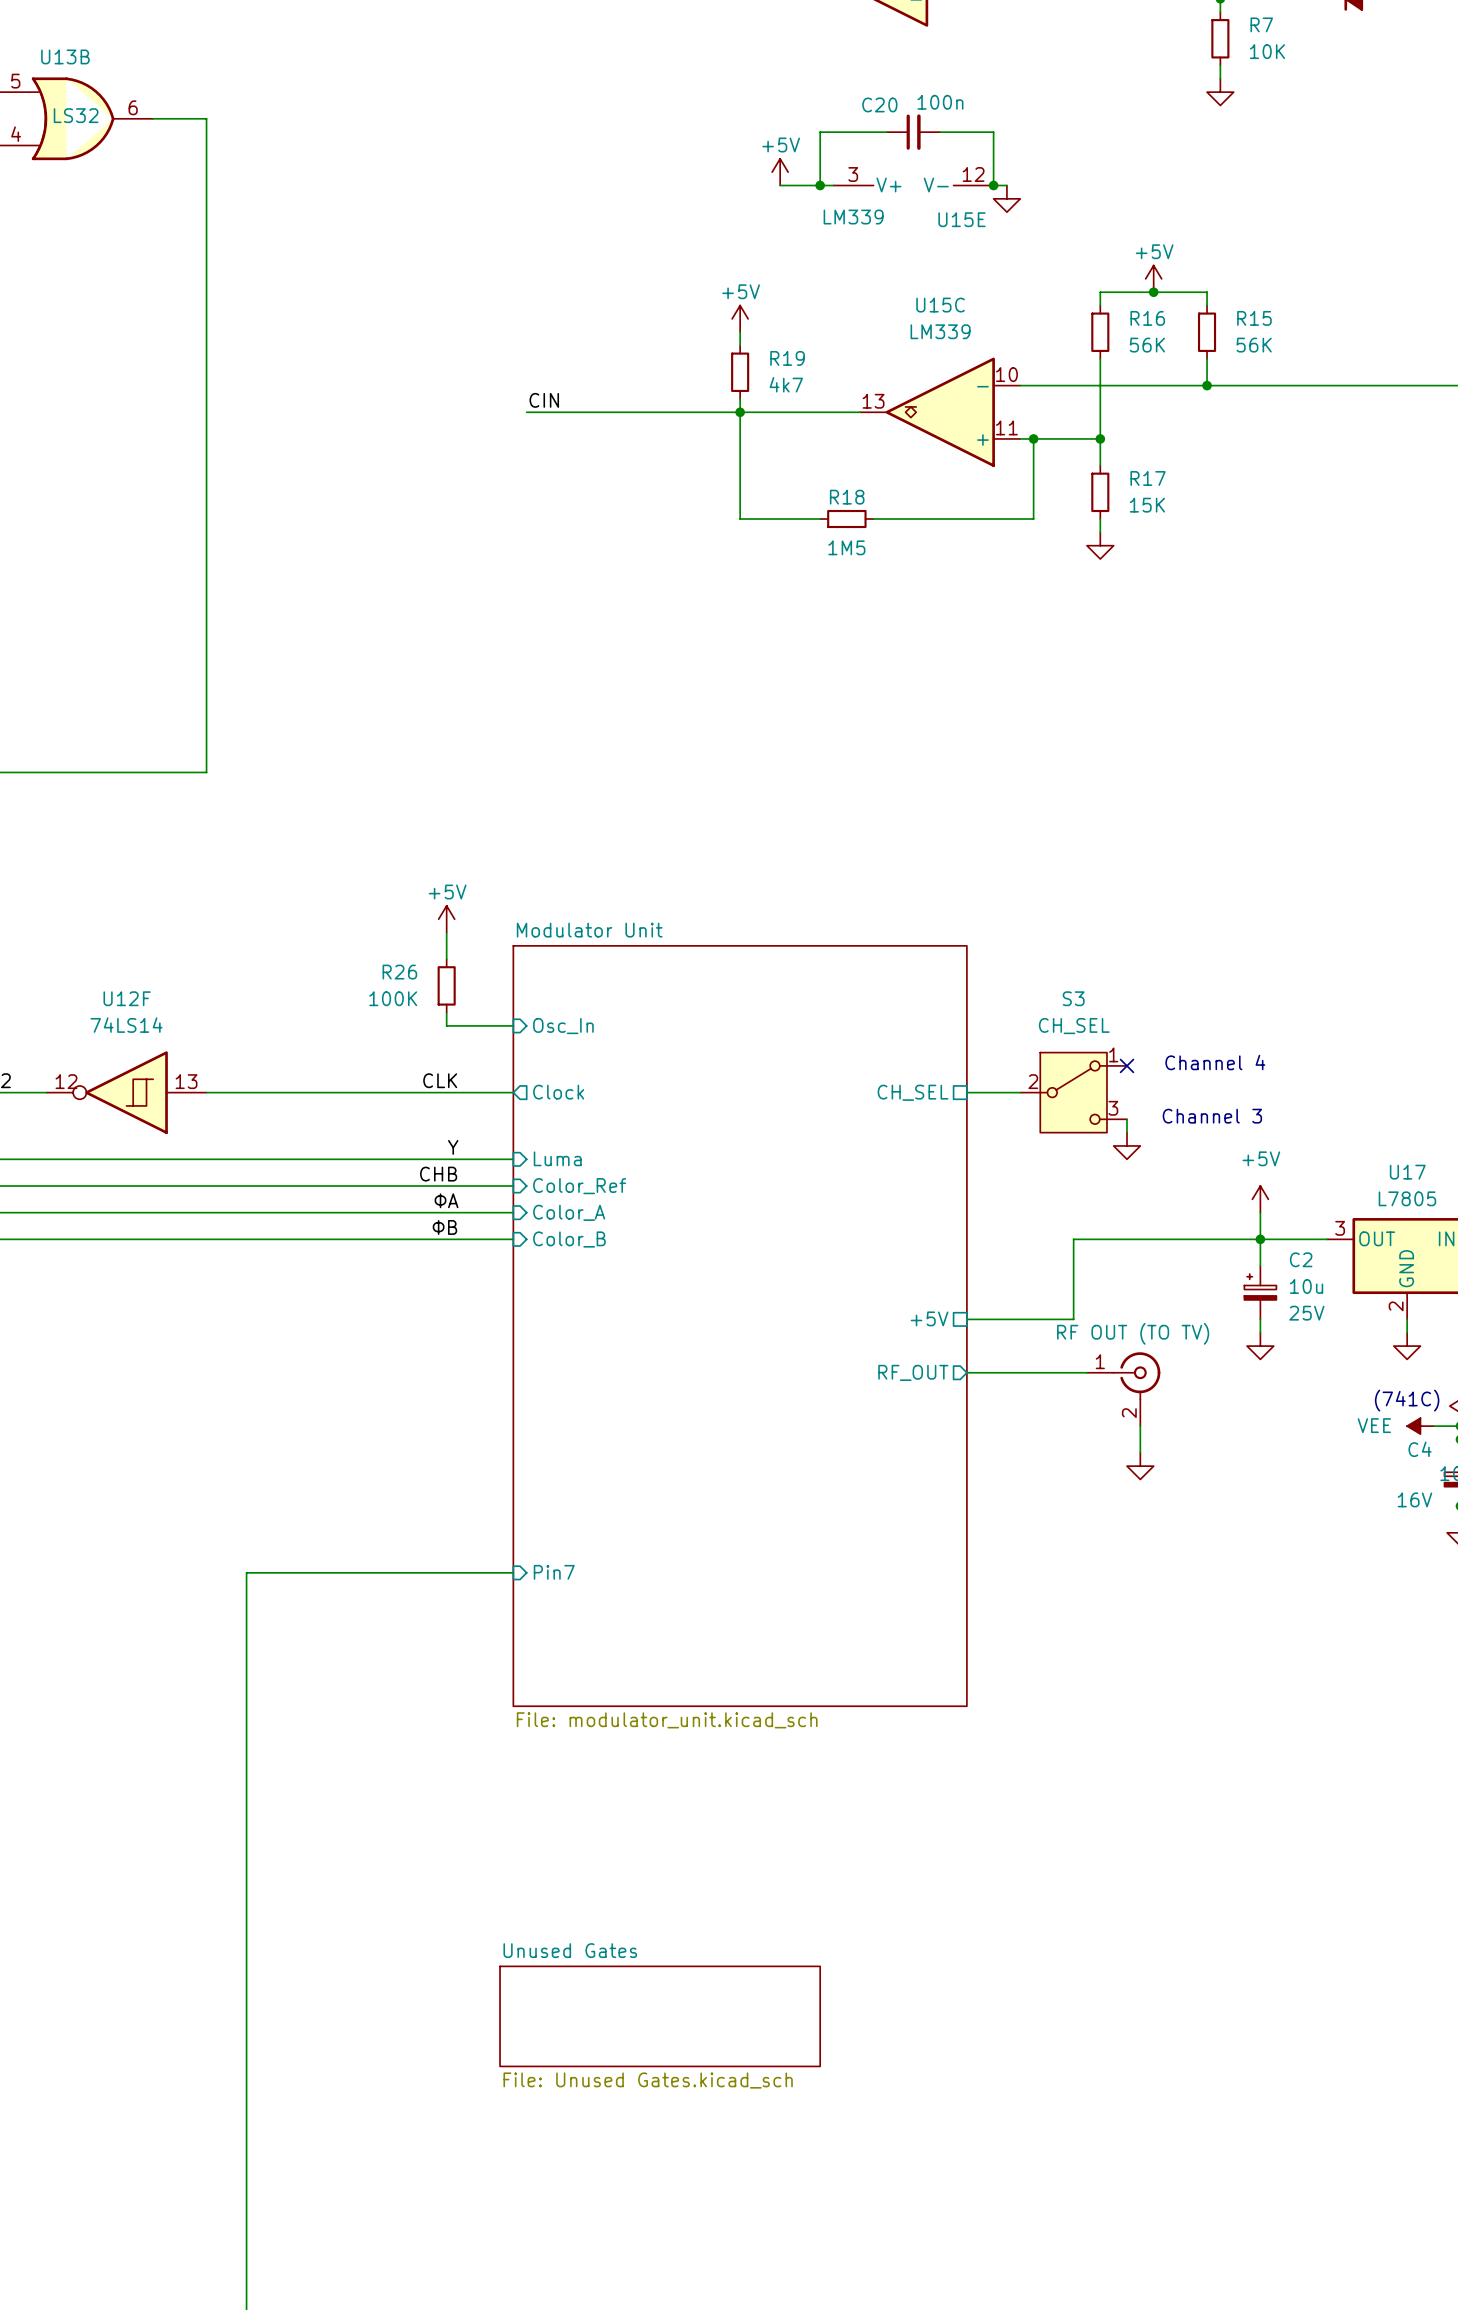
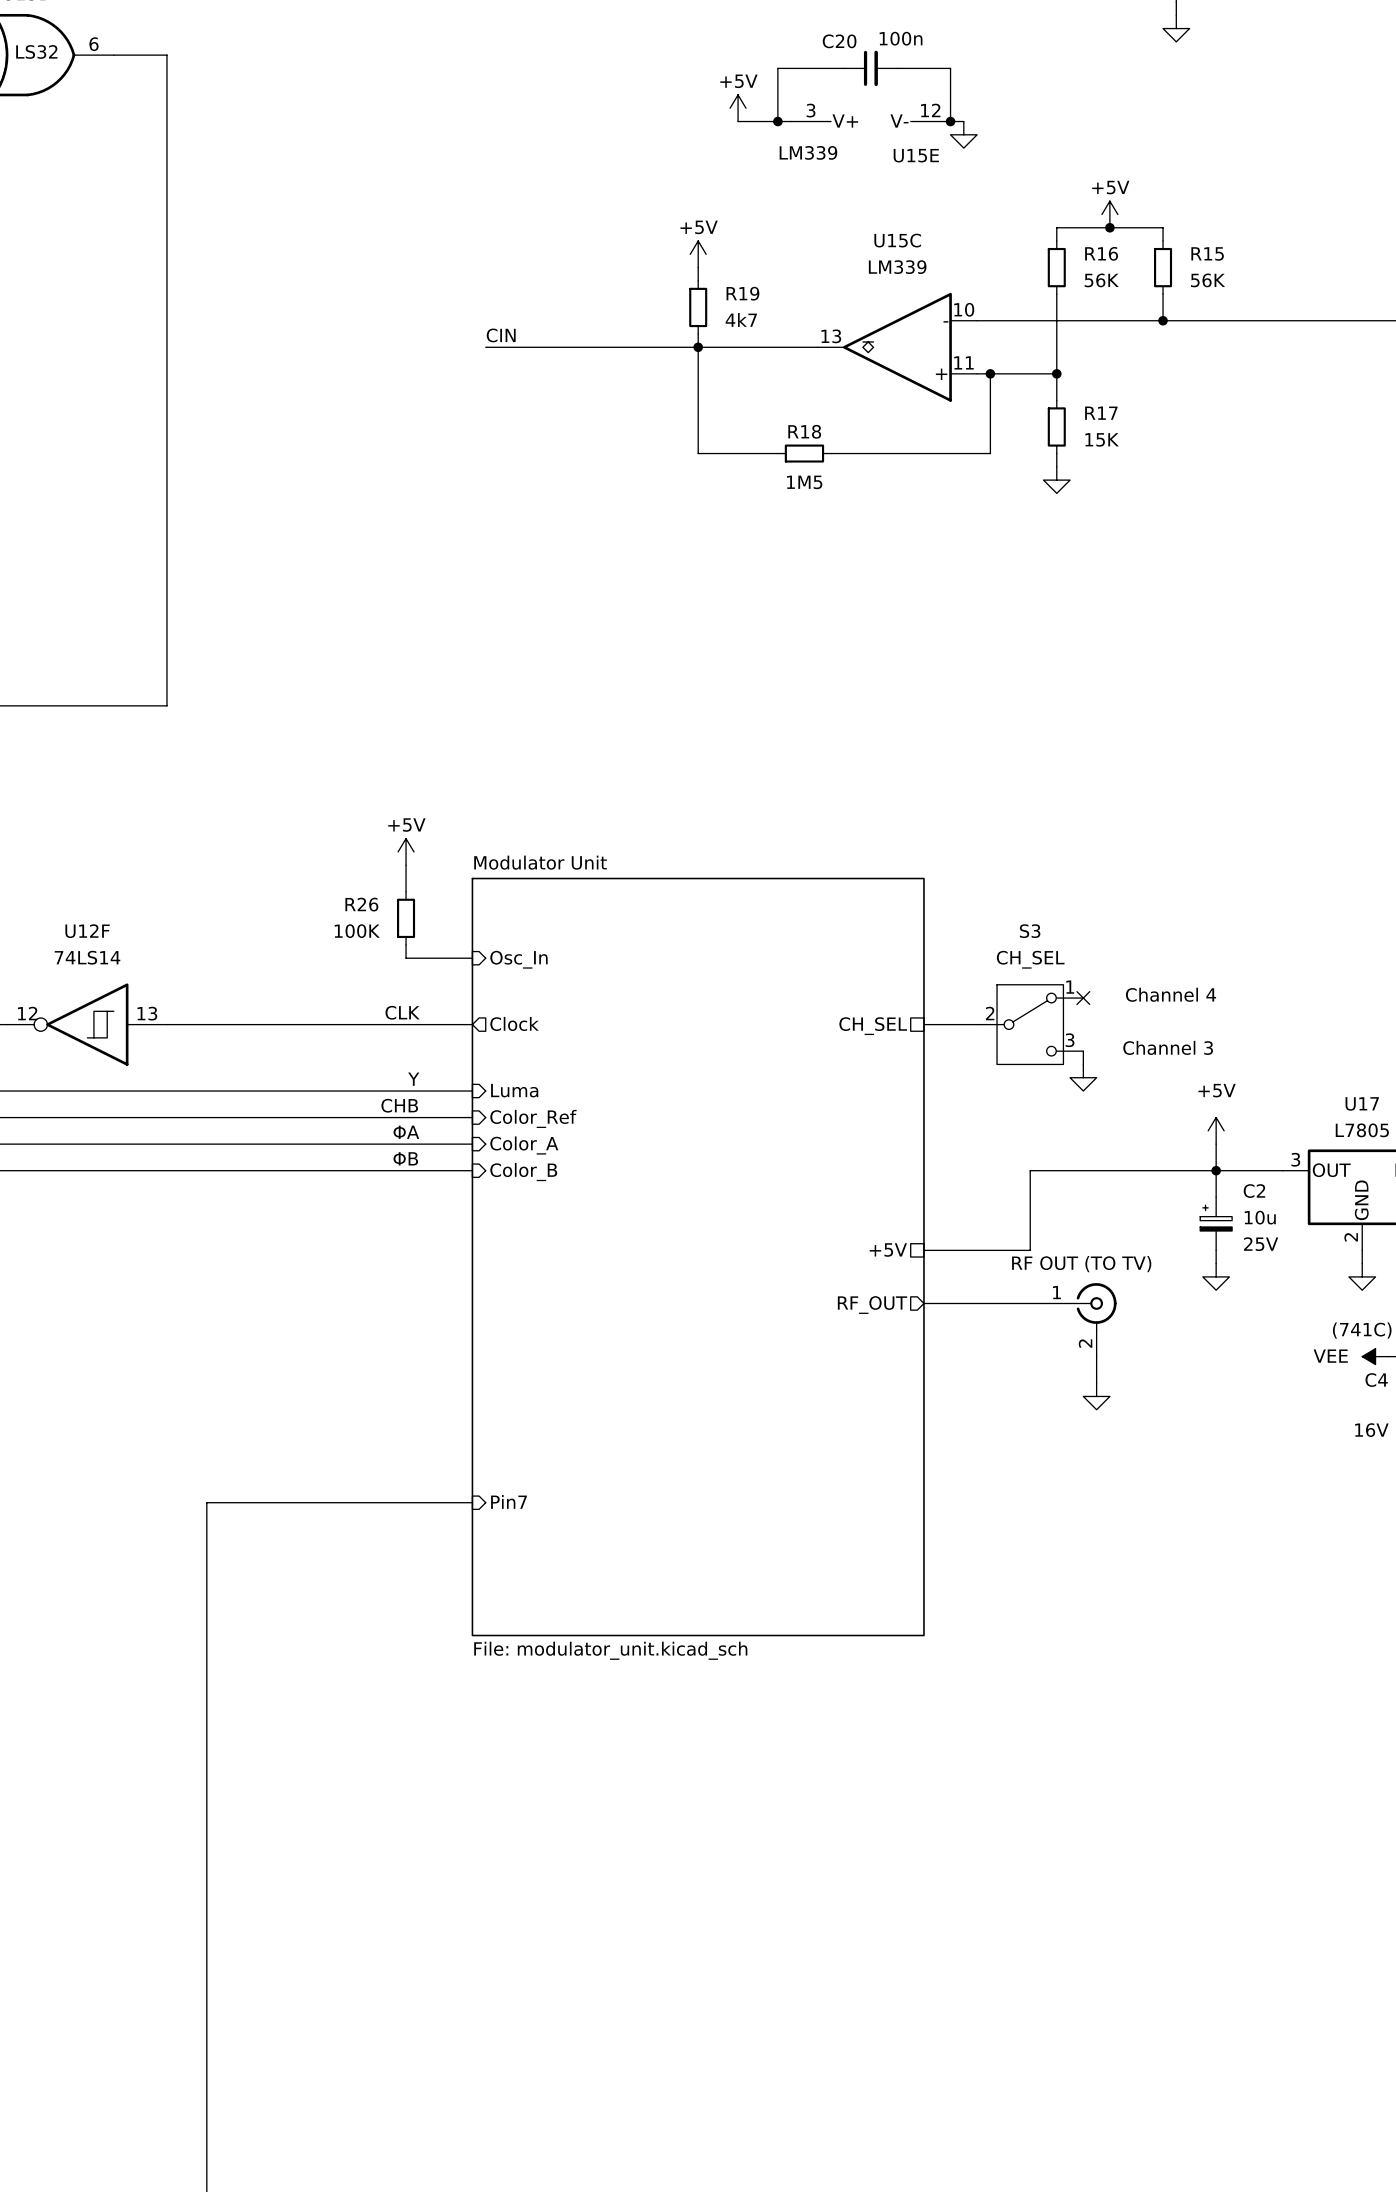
sheet Unused Gates: File: Unused Gates.kicad_sch (660, 2016) -> none

